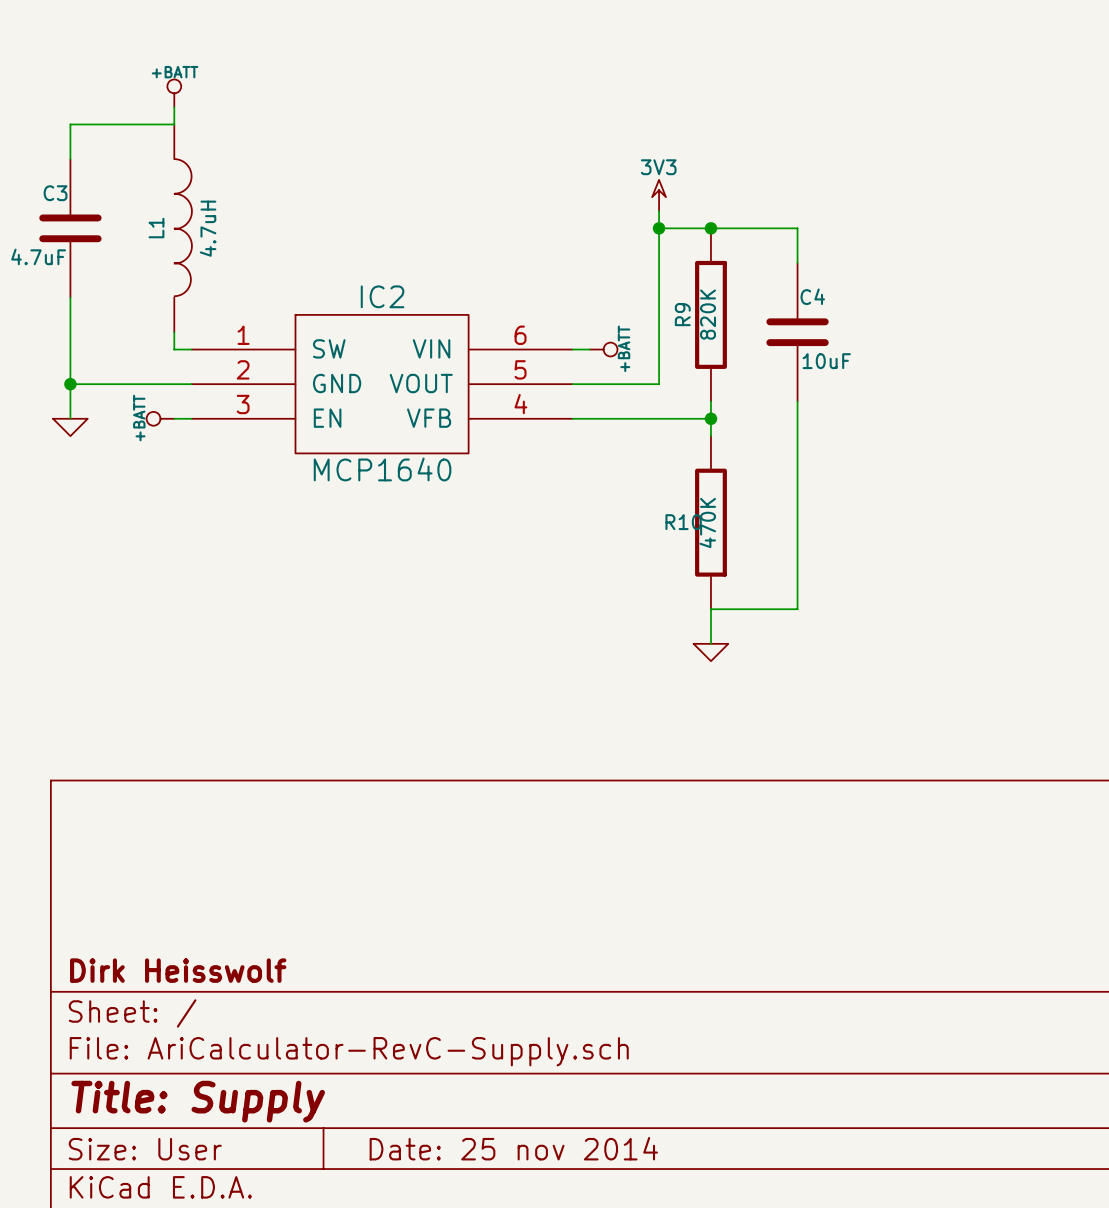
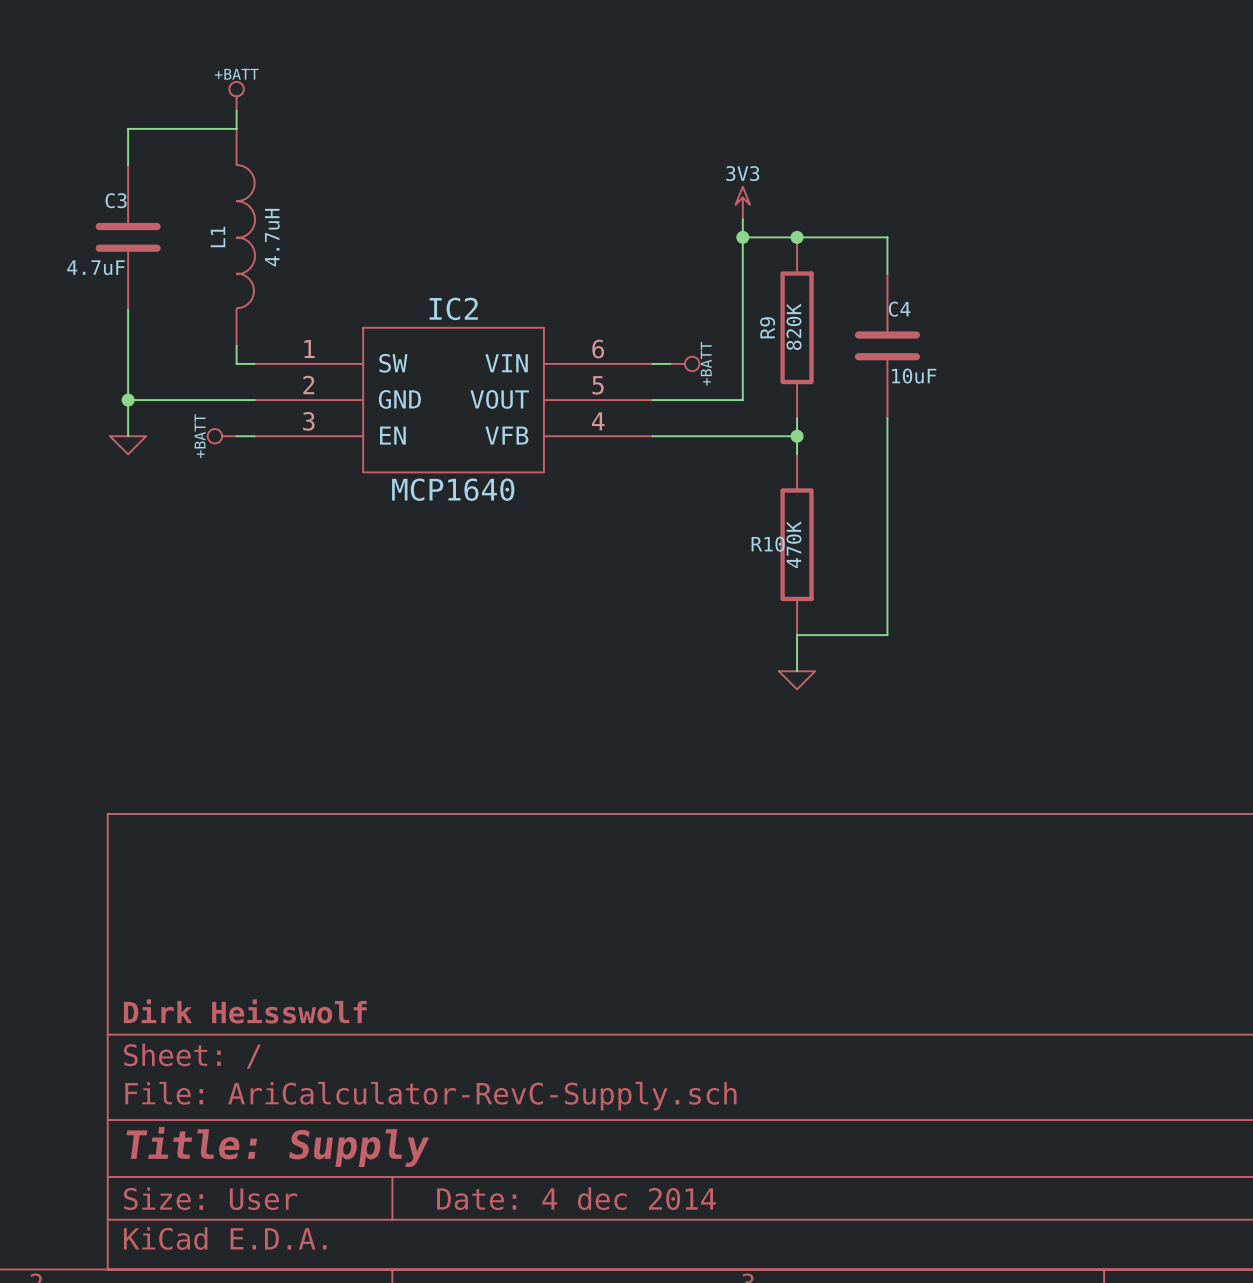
title block: Date: 25 nov 2014 (513, 1148) -> Date: 4 dec 2014 (576, 1198)

